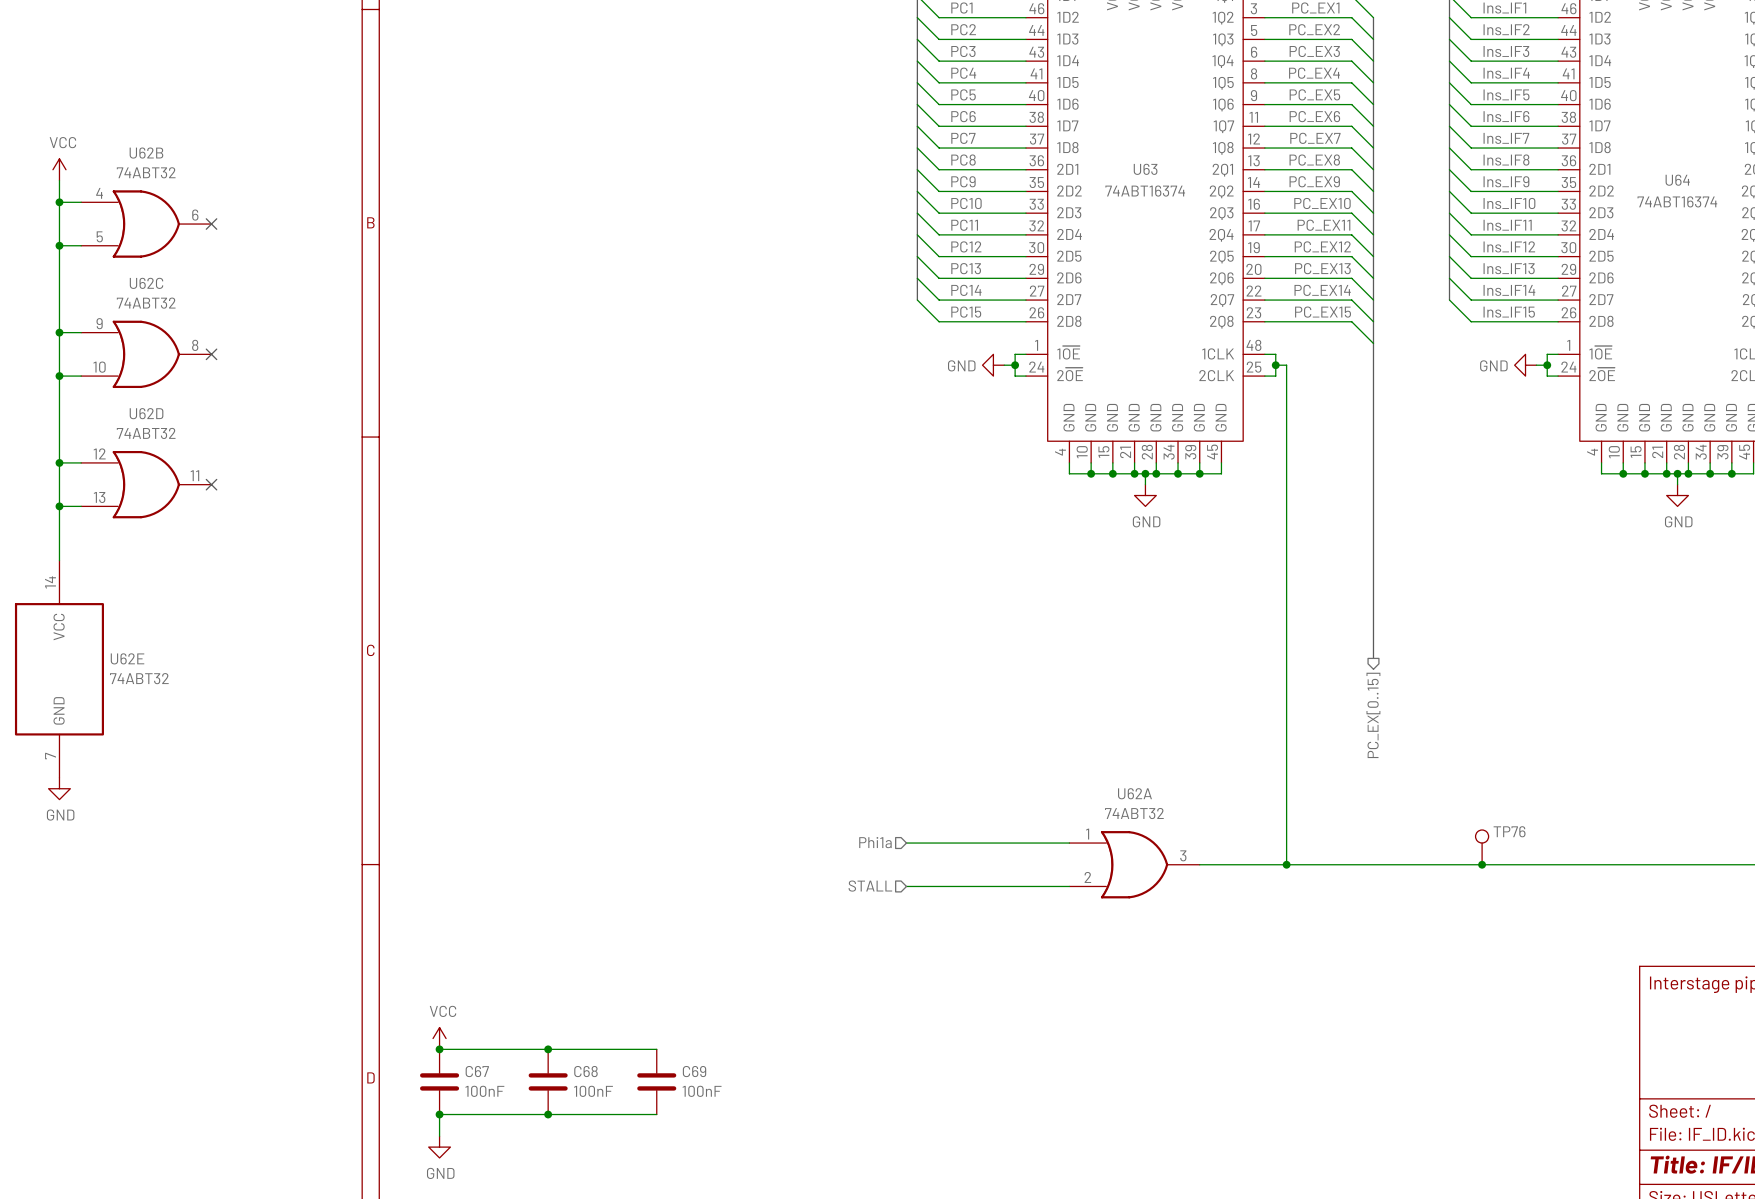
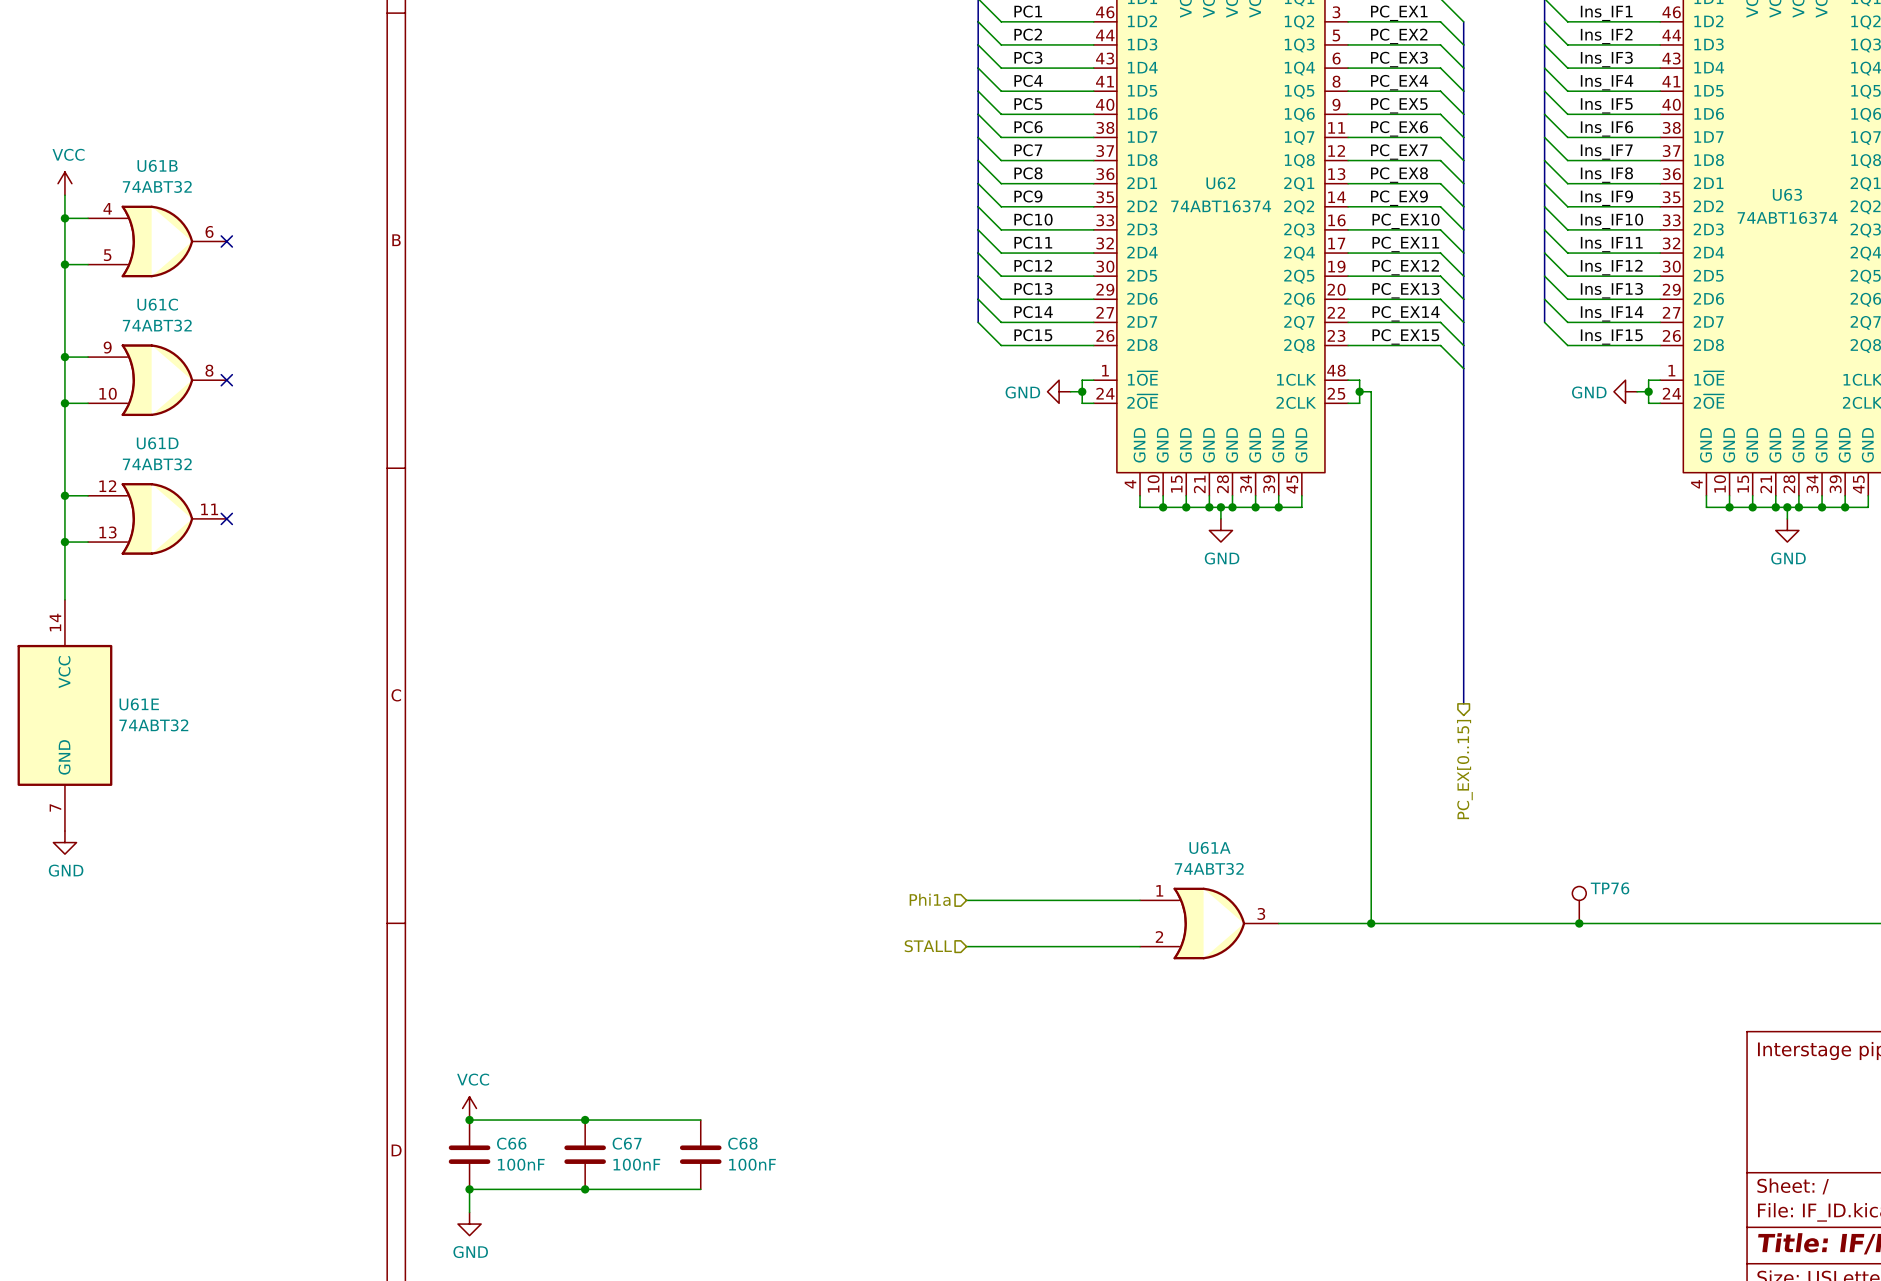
U62B name: U62B (146, 153) -> U61B (157, 165)
U63 name: U63 (1145, 169) -> U62 (1220, 183)
U64 name: U64 (1677, 180) -> U63 (1787, 194)
U62C name: U62C (146, 283) -> U61C (157, 304)
U62D name: U62D (146, 413) -> U61D (157, 443)
U62E name: U62E (127, 658) -> U61E (139, 704)
U62A name: U62A (1134, 793) -> U61A (1209, 847)
C67 name: C67 (477, 1071) -> C66 (511, 1143)
C68 name: C68 (585, 1071) -> C67 (627, 1143)
C69 name: C69 (694, 1071) -> C68 (742, 1143)

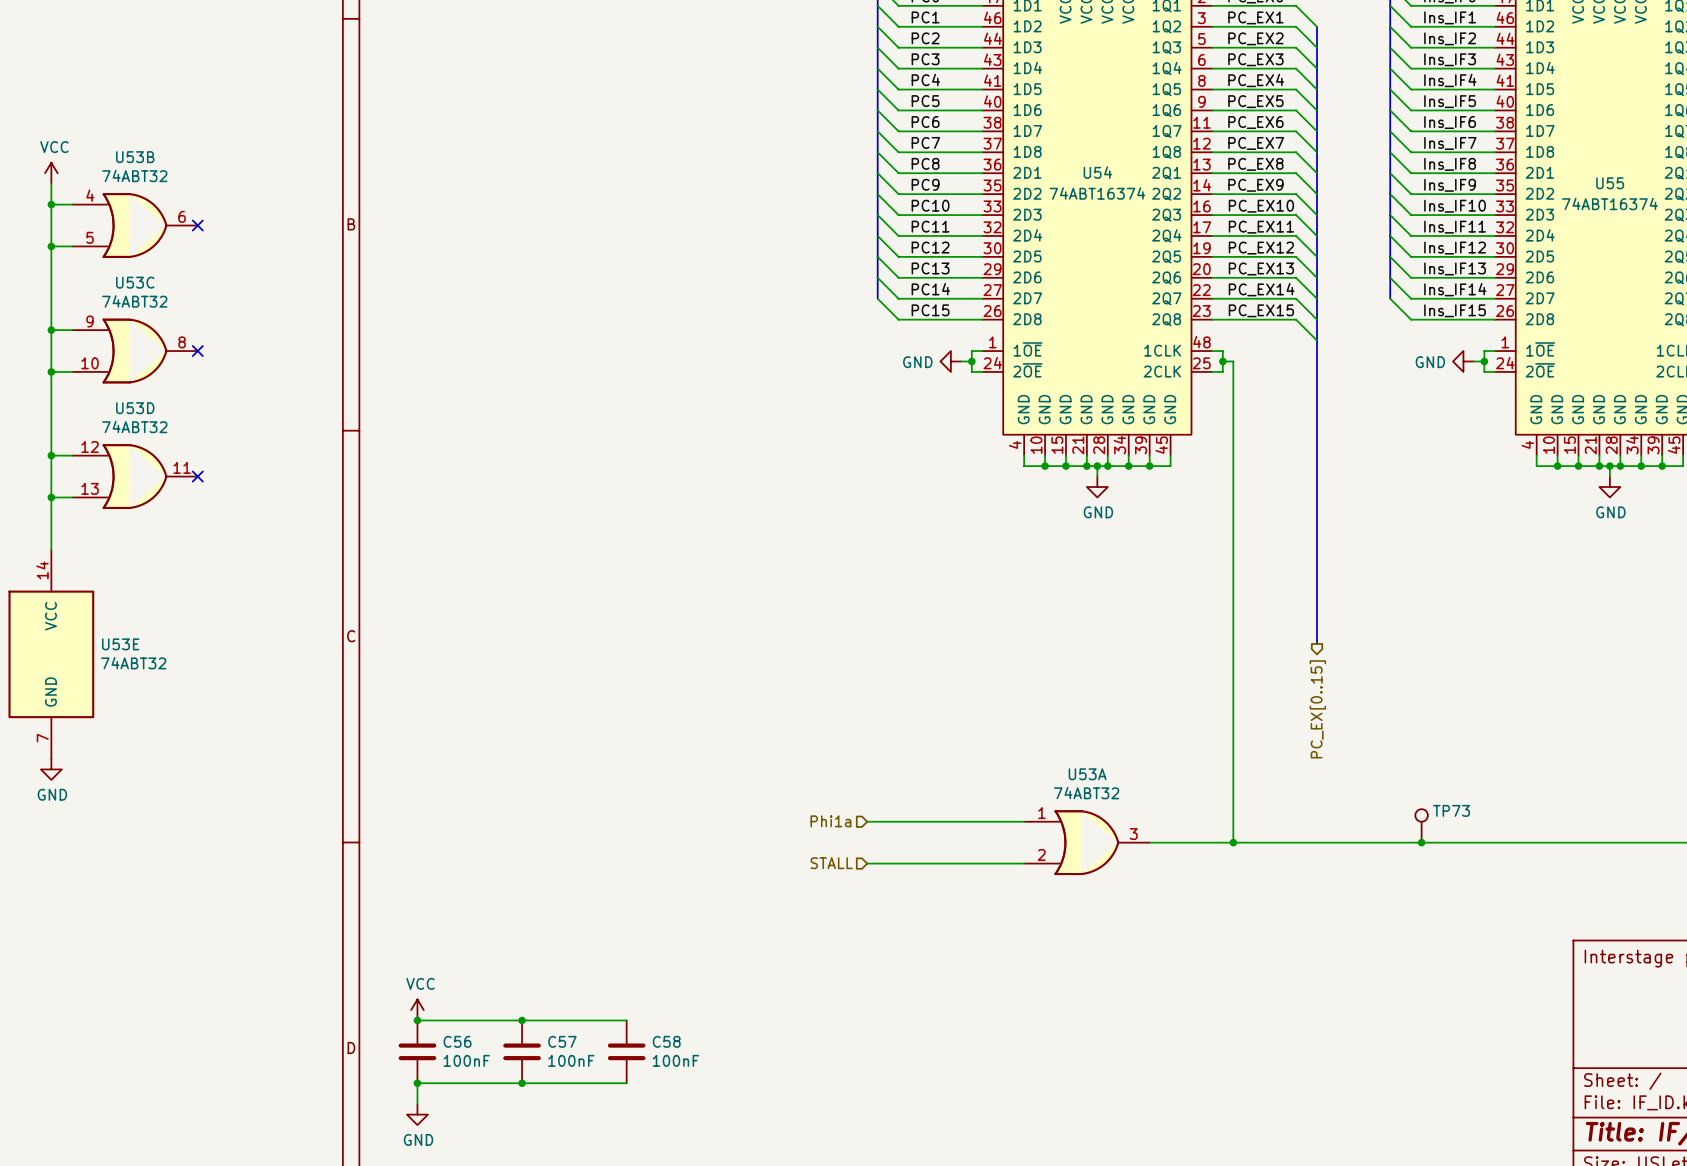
U61B name: U61B (157, 165) -> U53B (135, 157)
U62 name: U62 (1220, 183) -> U54 (1097, 172)
U63 name: U63 (1787, 194) -> U55 (1610, 183)
U61C name: U61C (157, 304) -> U53C (135, 282)
U61D name: U61D (157, 443) -> U53D (135, 408)
U61E name: U61E (139, 704) -> U53E (120, 644)
U61A name: U61A (1209, 847) -> U53A (1087, 774)
TP76 name: TP76 (1610, 888) -> TP73 (1451, 810)
C66 name: C66 (511, 1143) -> C56 (457, 1041)
C67 name: C67 (627, 1143) -> C57 (562, 1041)
C68 name: C68 (742, 1143) -> C58 (666, 1041)

